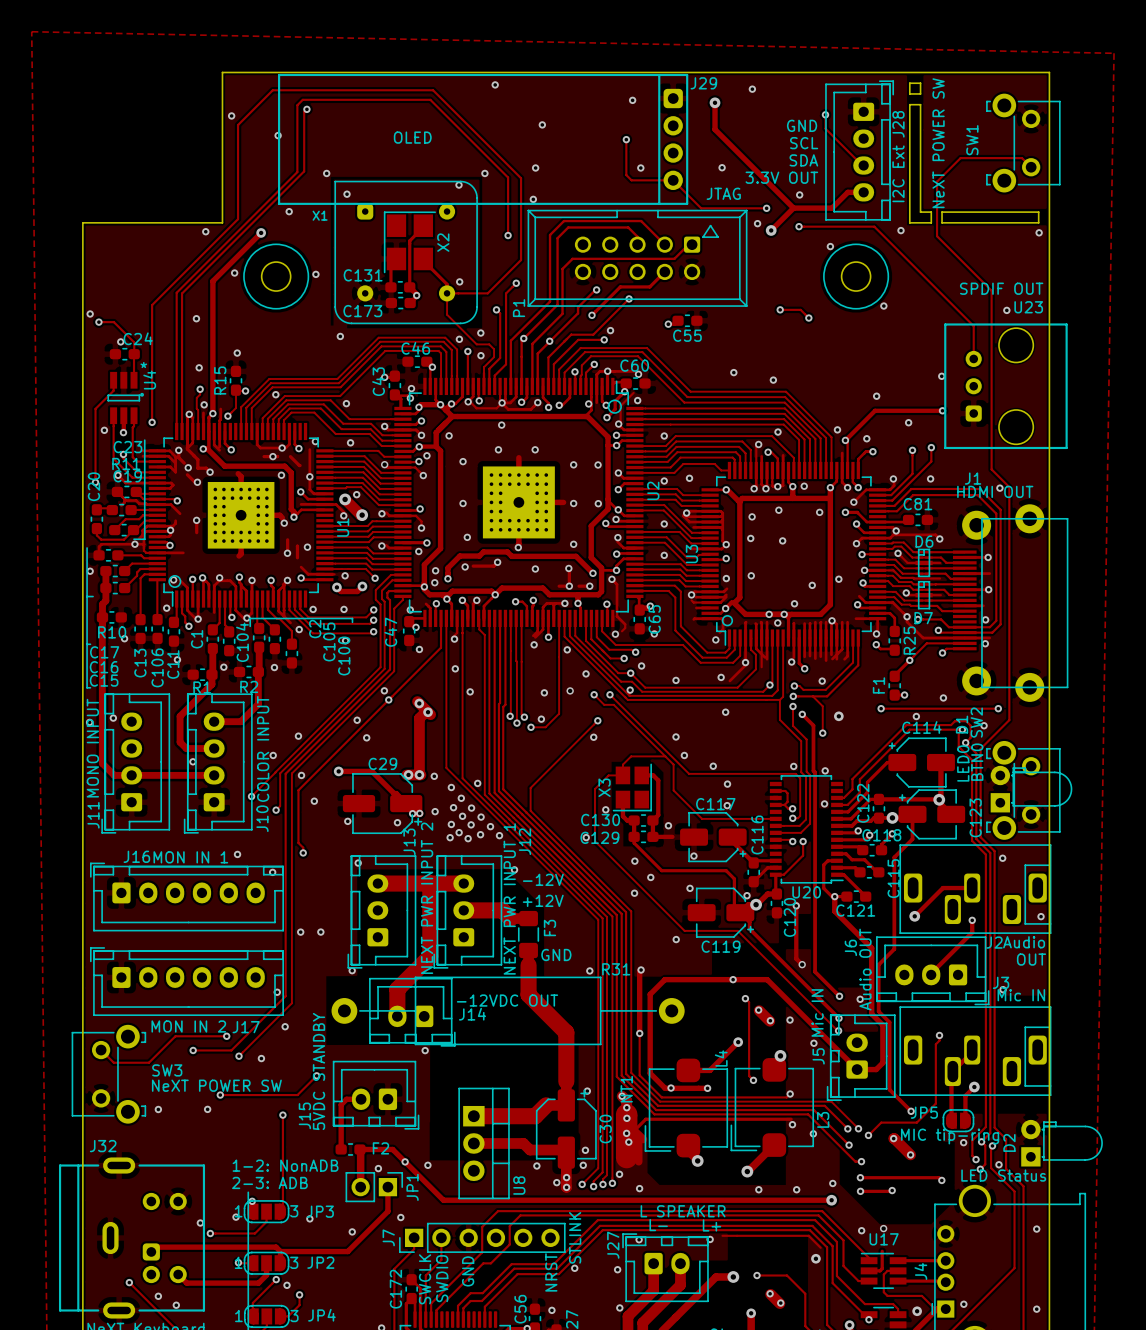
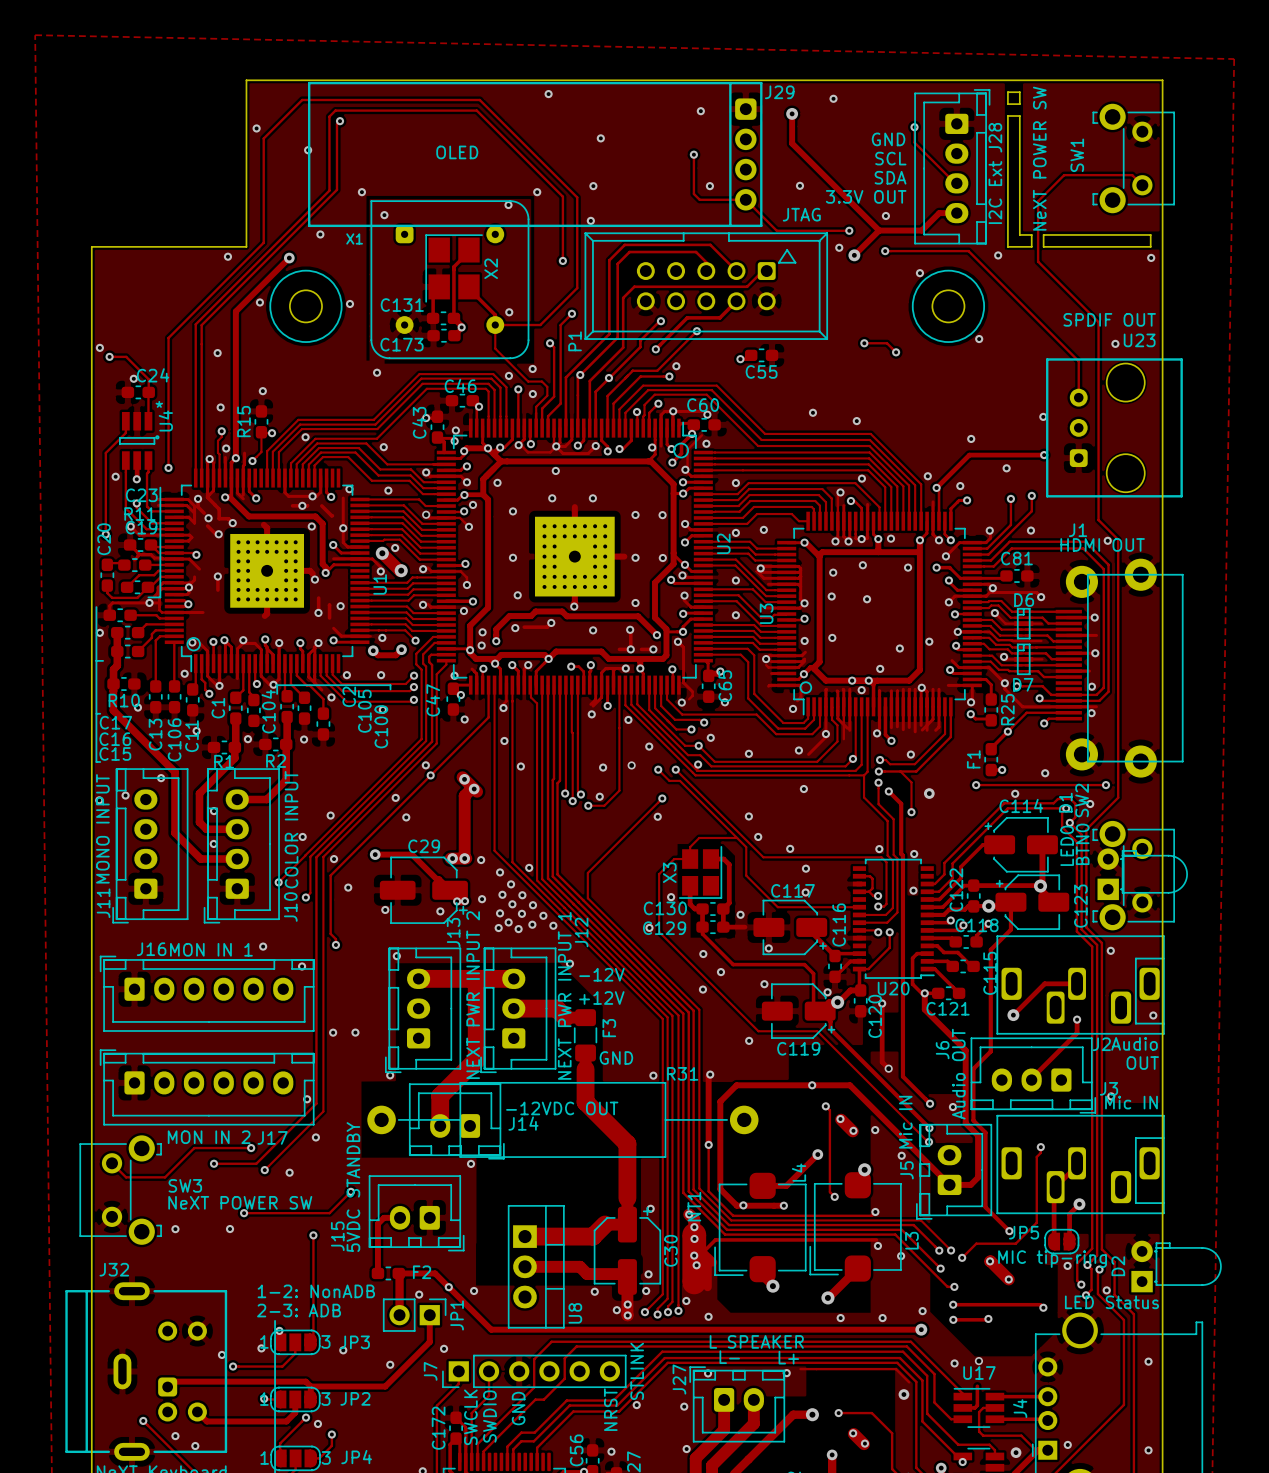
track: (102, 641) (102, 763) (114, 775) (181, 775) -> (113, 710) (175, 772) (175, 833) (200, 859)
via: none -> (161, 778)
via: none -> (214, 811)

